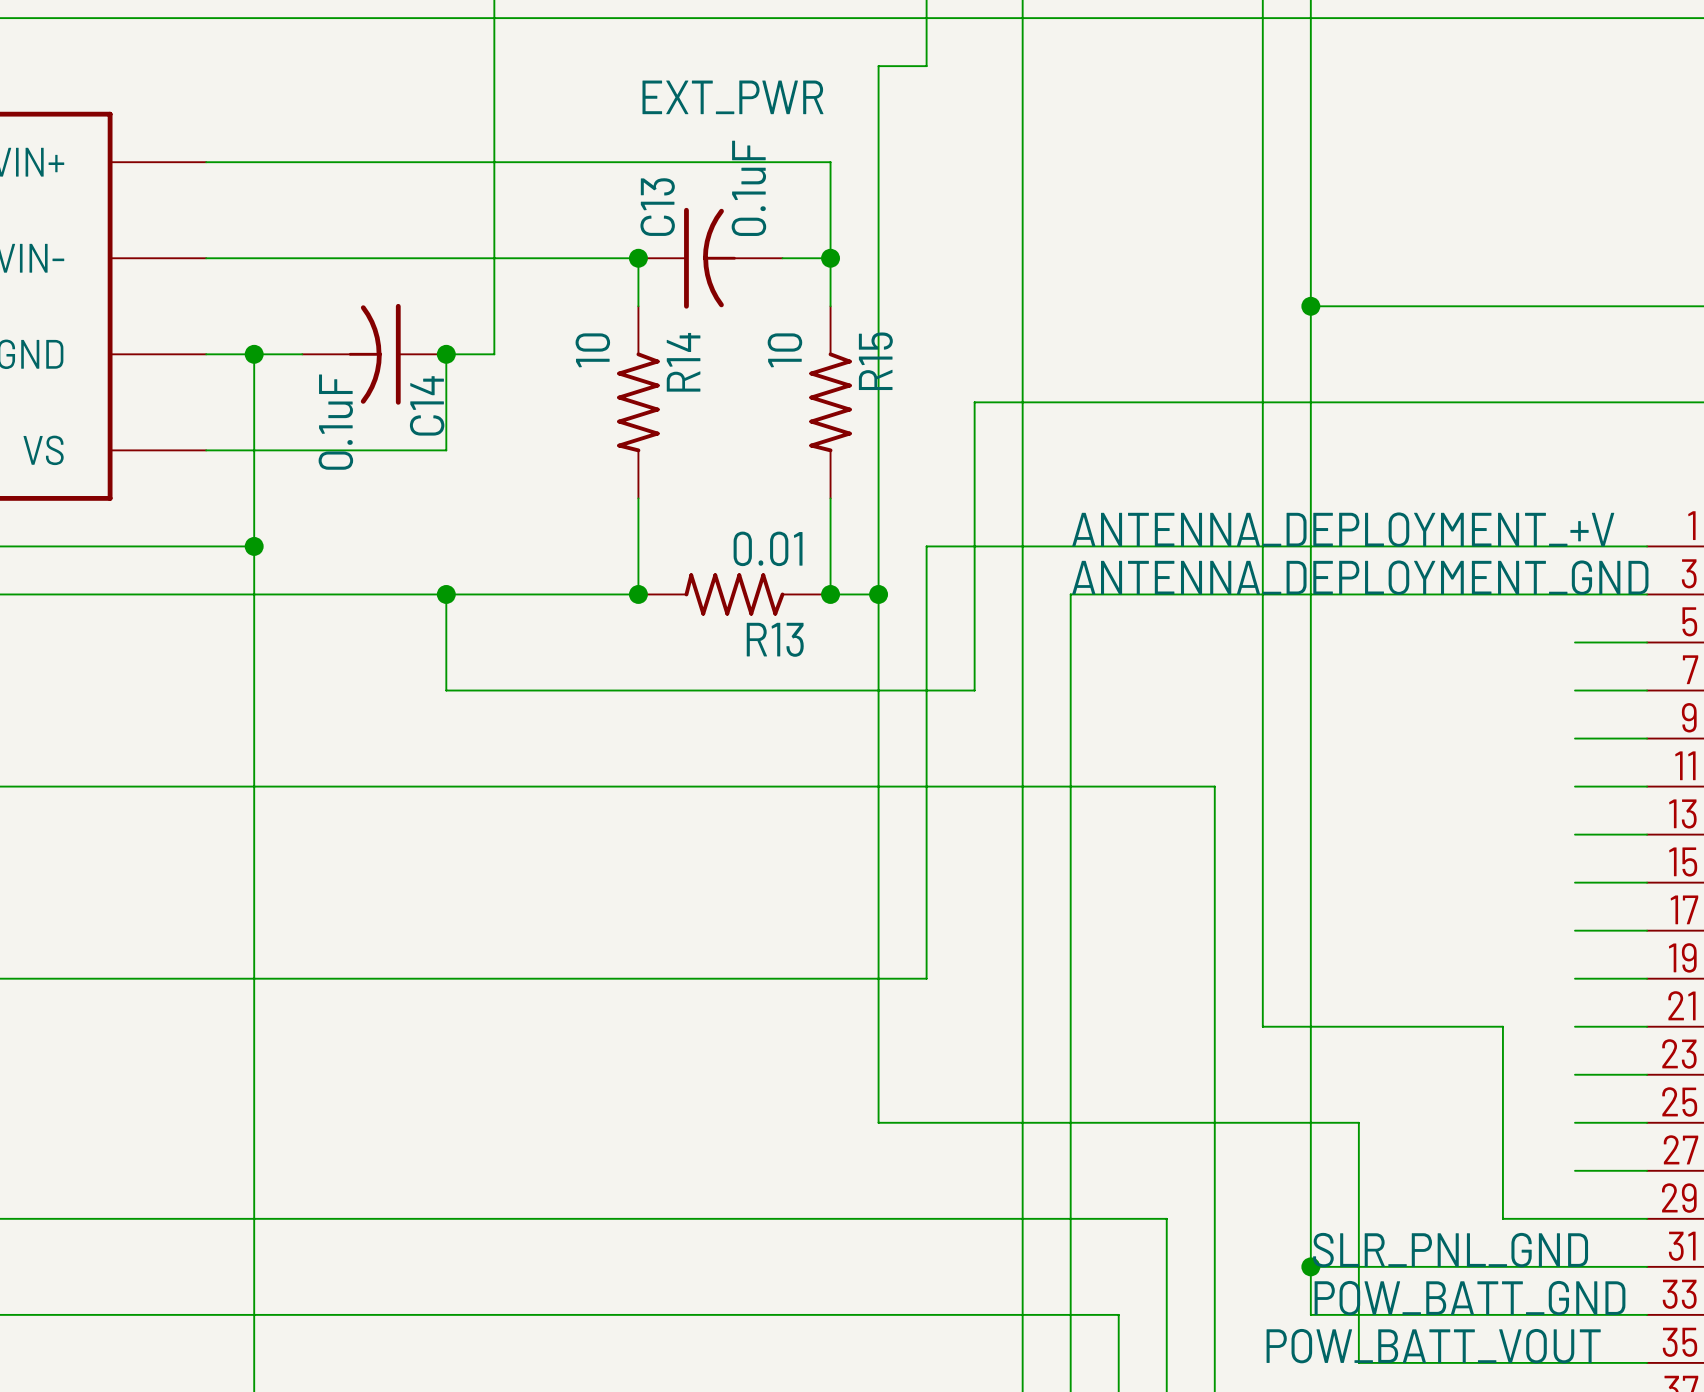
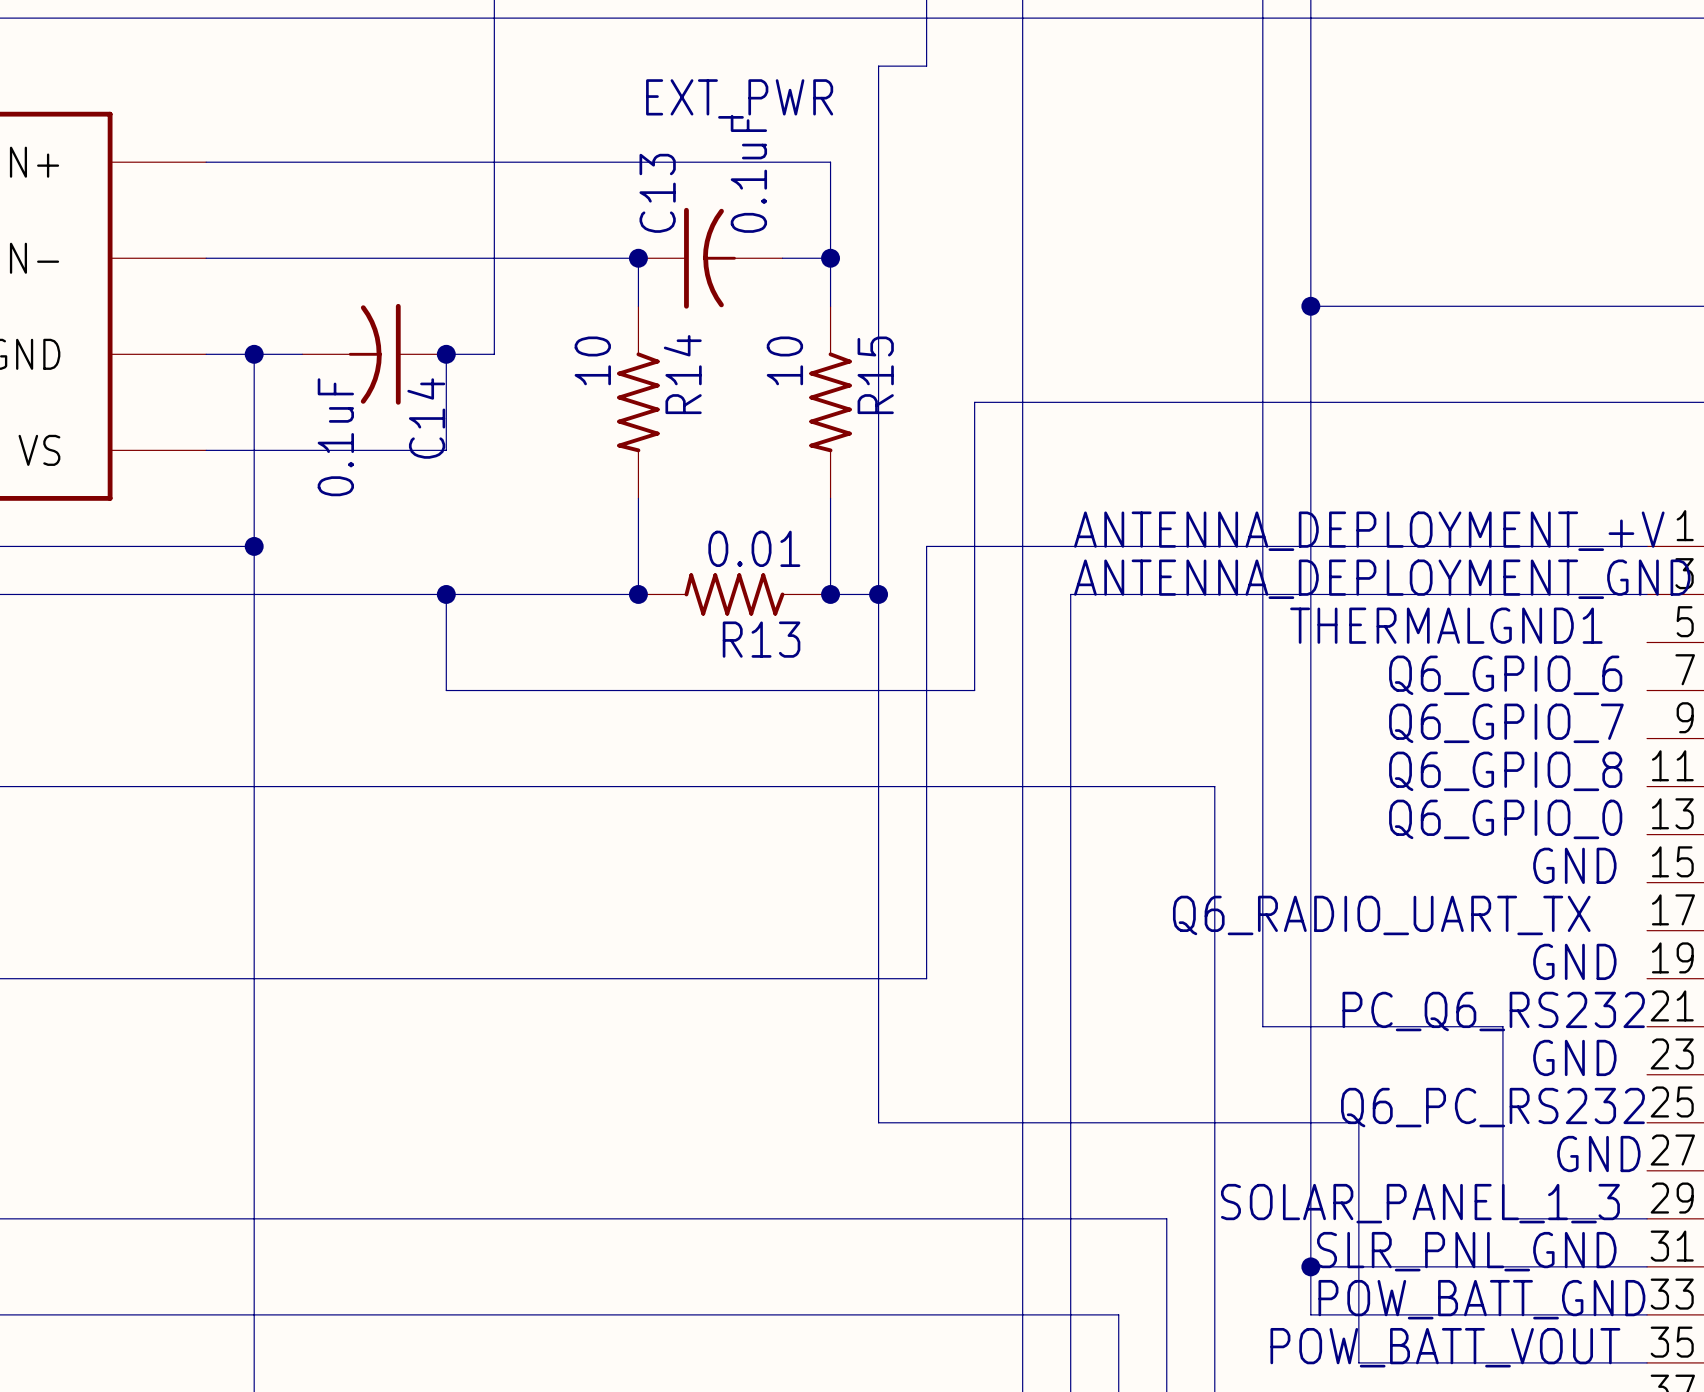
text: none -> THERMALGND1 (1446, 625)
wire: (1575, 642) (1647, 642) -> none
text: none -> Q6_GPIO_6 (1505, 675)
wire: (1575, 690) (1647, 690) -> none
text: none -> Q6_GPIO_7 (1506, 723)
wire: (1575, 738) (1647, 738) -> none
text: none -> Q6_GPIO_8 (1505, 771)
wire: (1575, 786) (1647, 786) -> none
text: none -> Q6_GPIO_0 (1505, 819)
wire: (1575, 834) (1647, 834) -> none
text: none -> GND (1574, 865)
wire: (1575, 882) (1647, 882) -> none
text: none -> Q6_RADIO_UART_TX (1381, 915)
wire: (1575, 930) (1647, 930) -> none
text: none -> GND (1574, 961)
wire: (1575, 978) (1647, 978) -> none
text: none -> PC_Q6_RS232 (1493, 1011)
wire: (1575, 1026) (1647, 1026) -> none
text: none -> GND (1574, 1057)
wire: (1575, 1074) (1647, 1074) -> none
text: none -> Q6_PC_RS232 (1492, 1107)
wire: (1575, 1122) (1647, 1122) -> none
text: none -> GND (1598, 1154)
wire: (1575, 1170) (1647, 1170) -> none
text: none -> SOLAR_PANEL_1_3 (1420, 1203)

